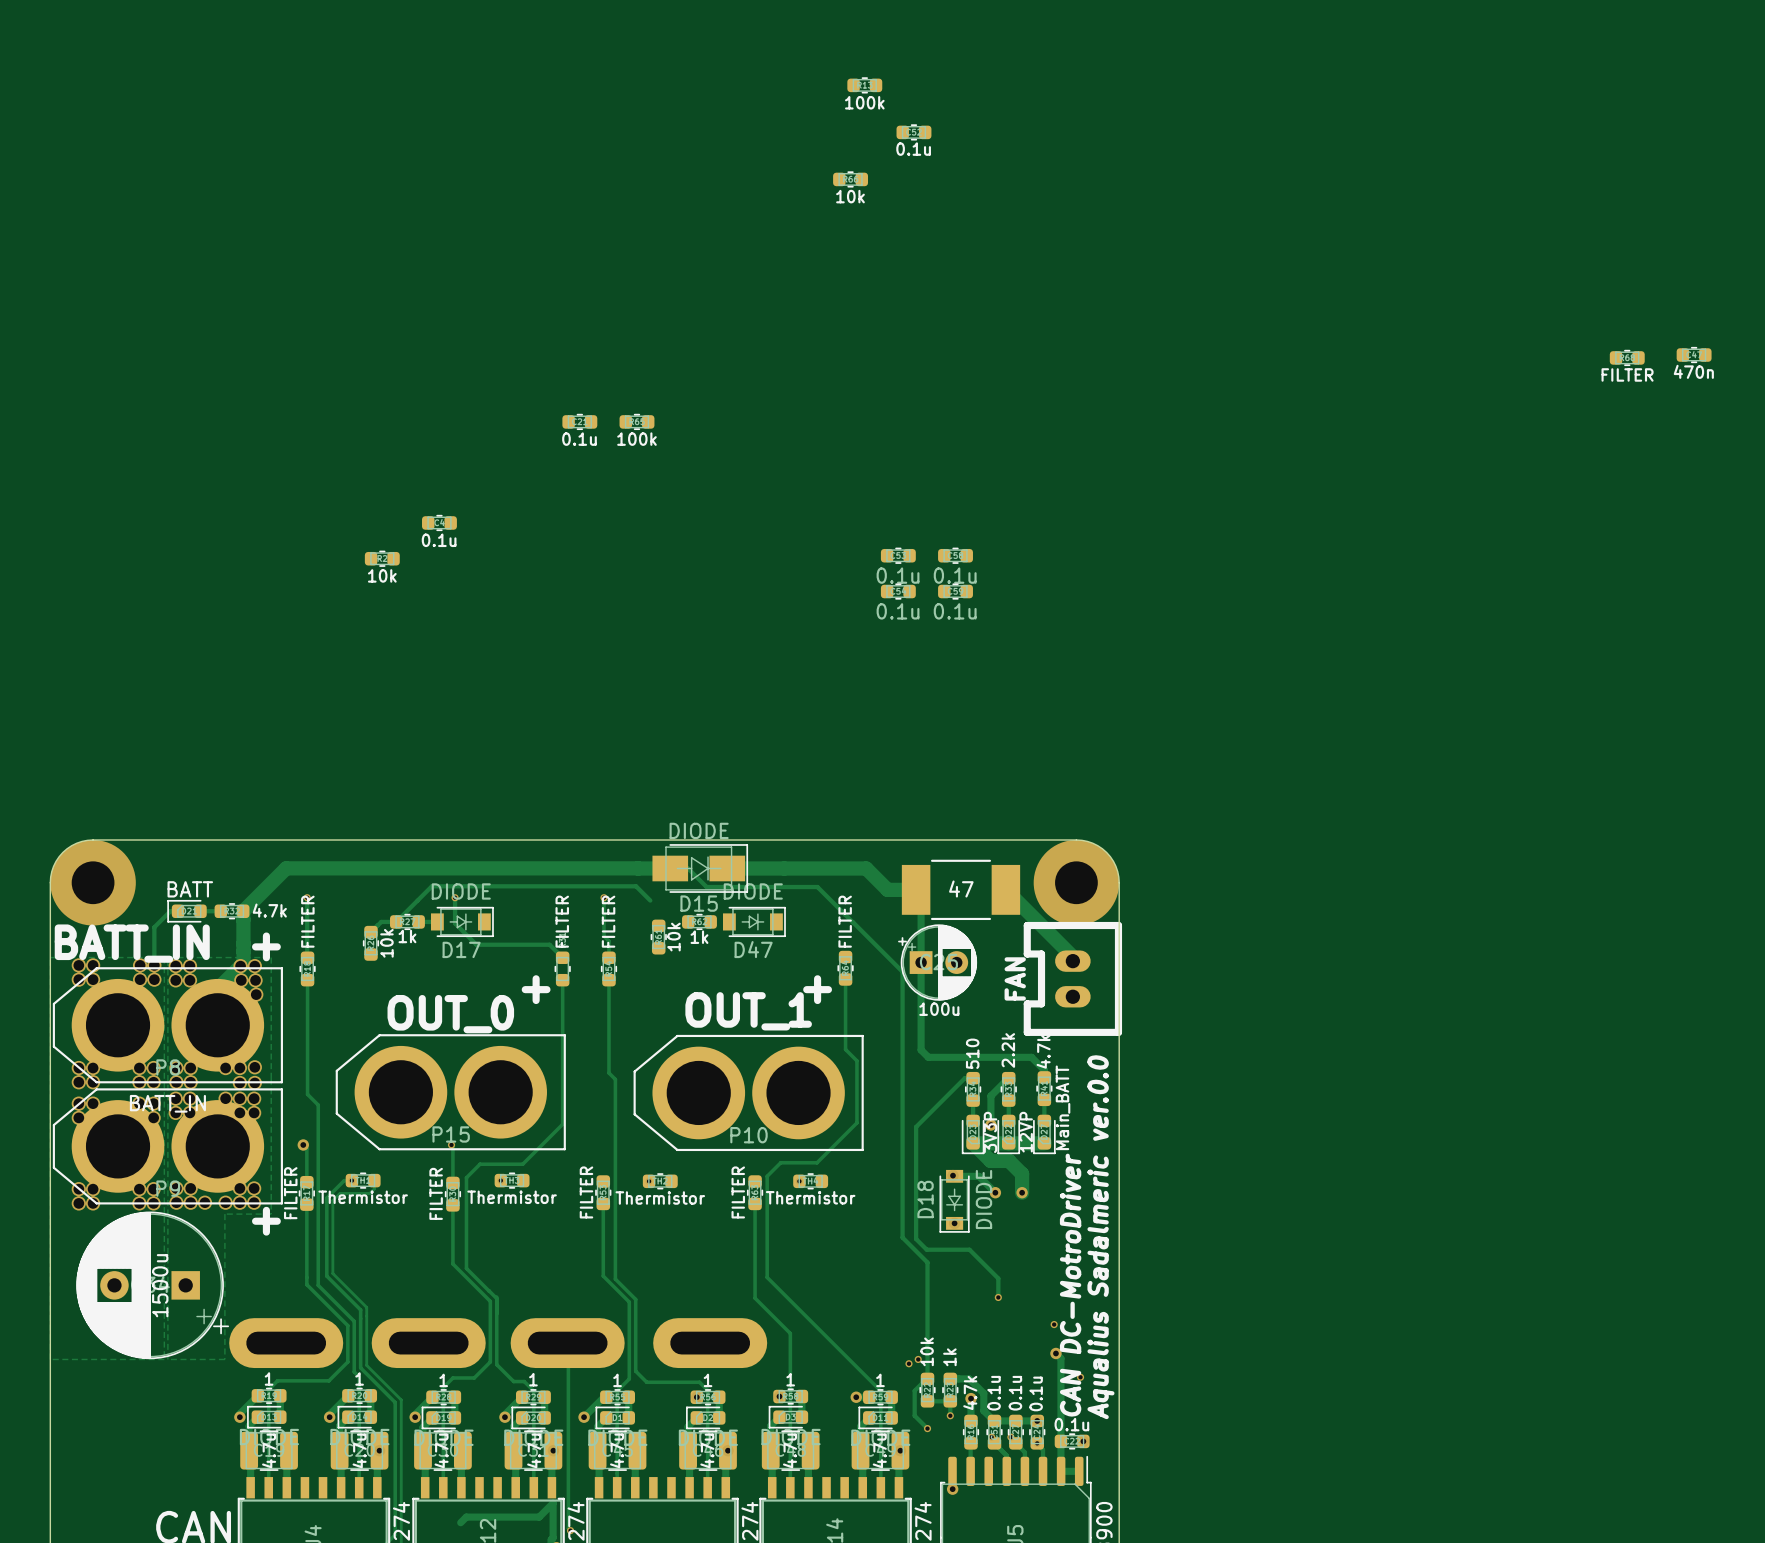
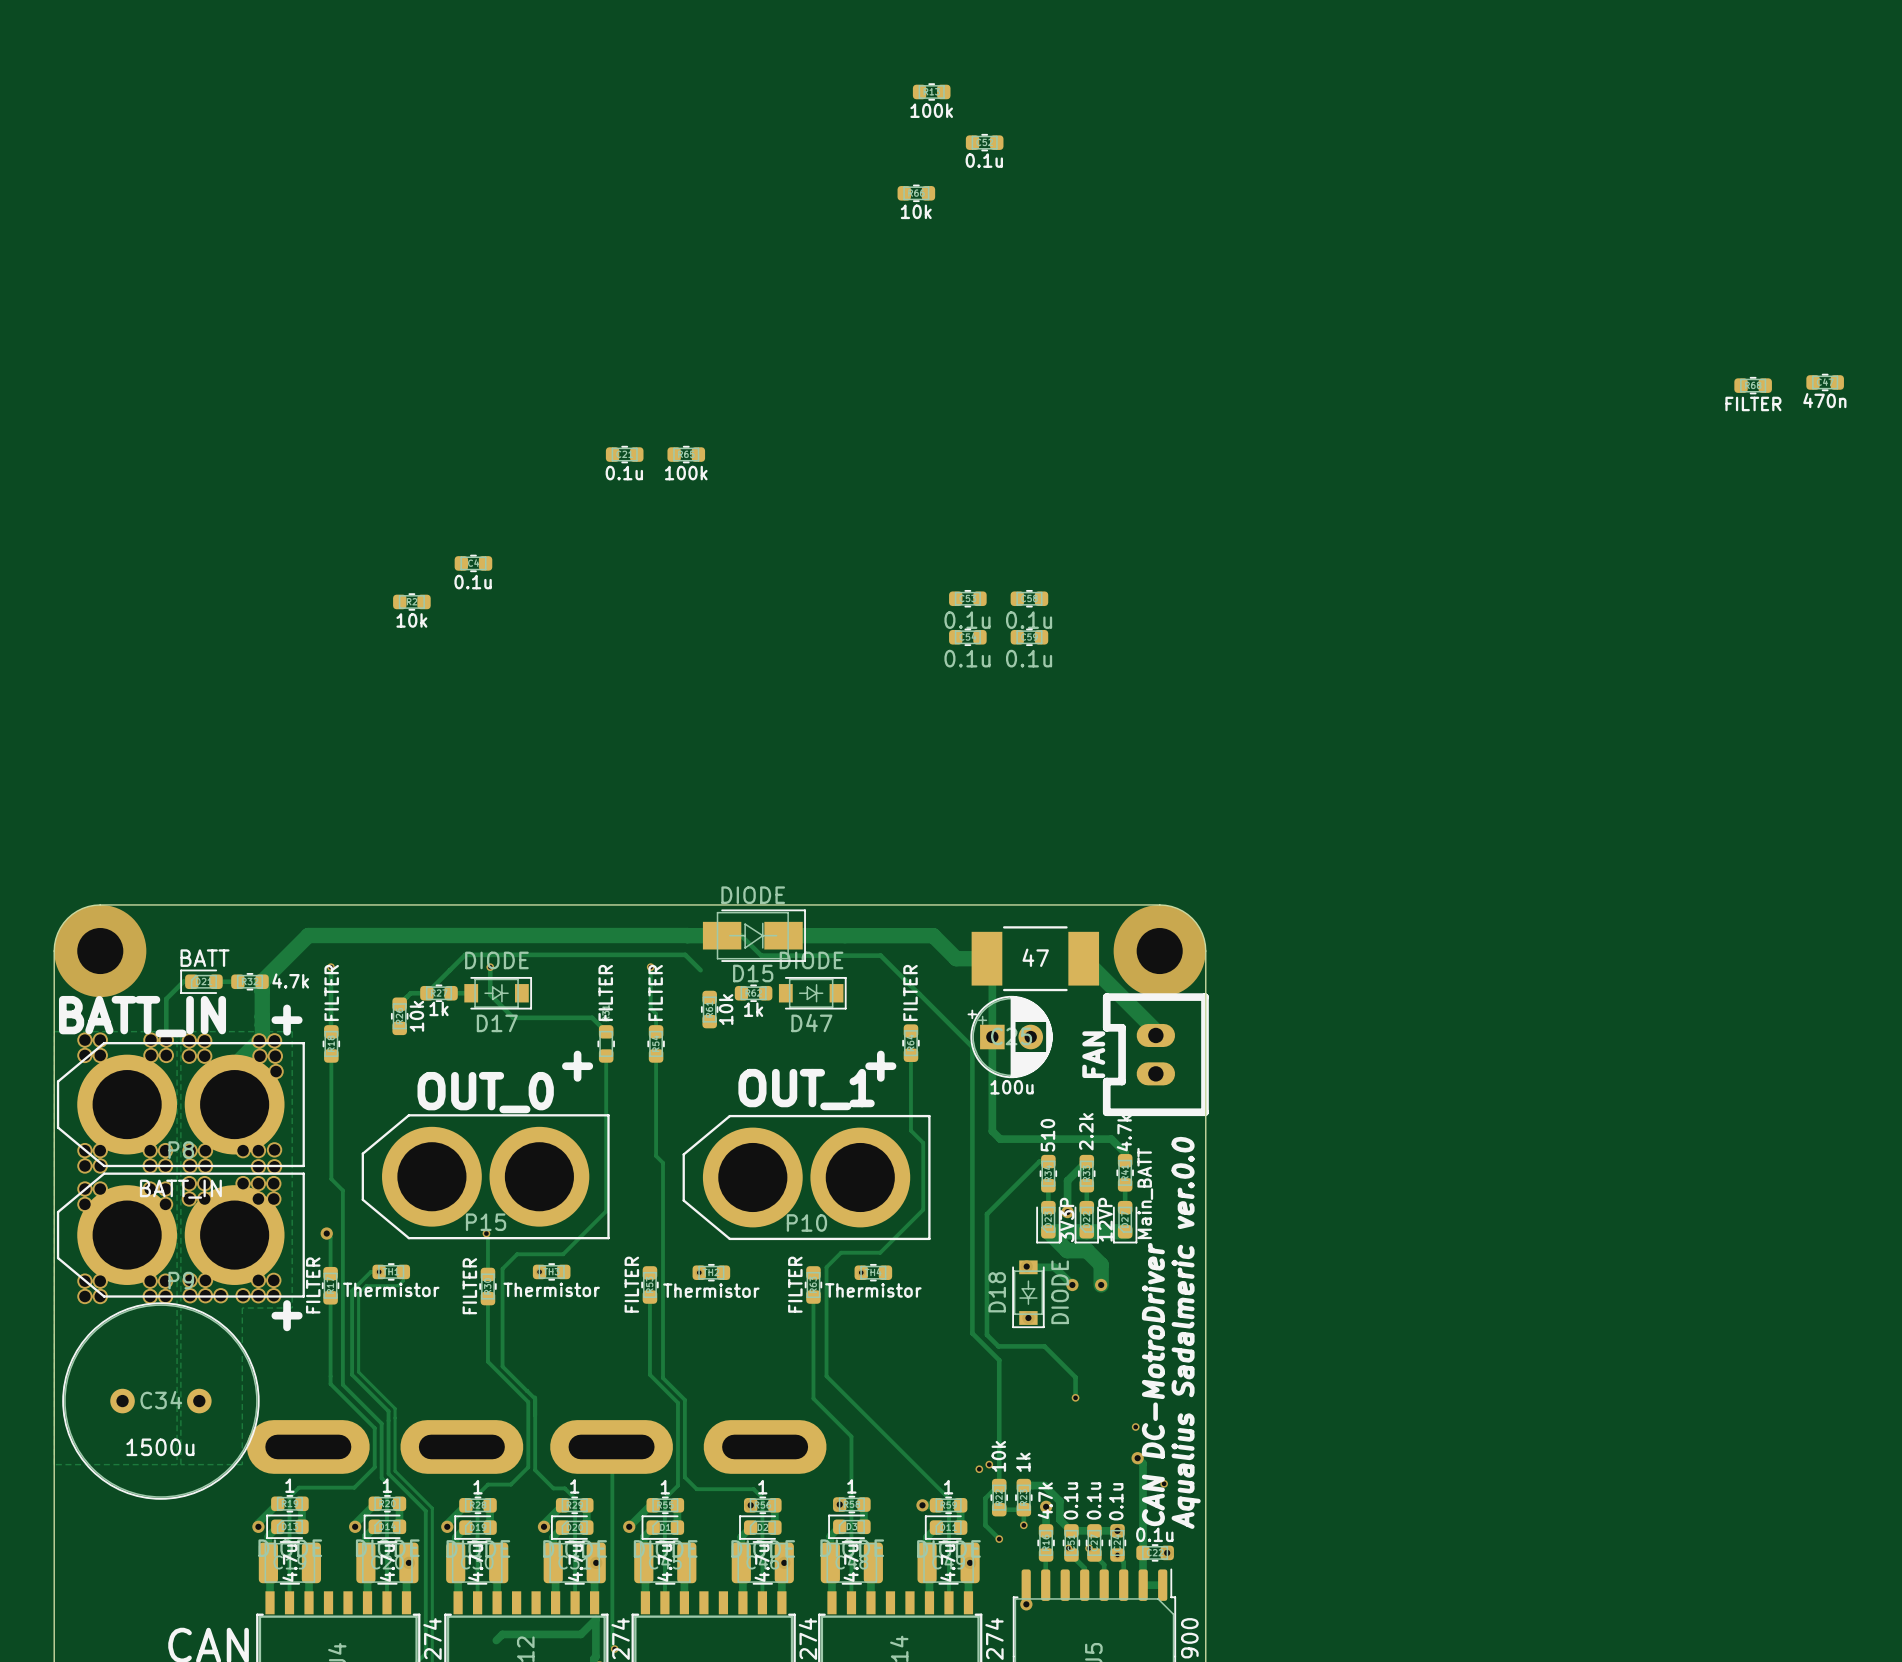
C34 footprint: [76, 1211, 230, 1360] -> [62, 1302, 260, 1500]
C34 value position: 1500u (160, 1285) -> 1500u (160, 1447)

